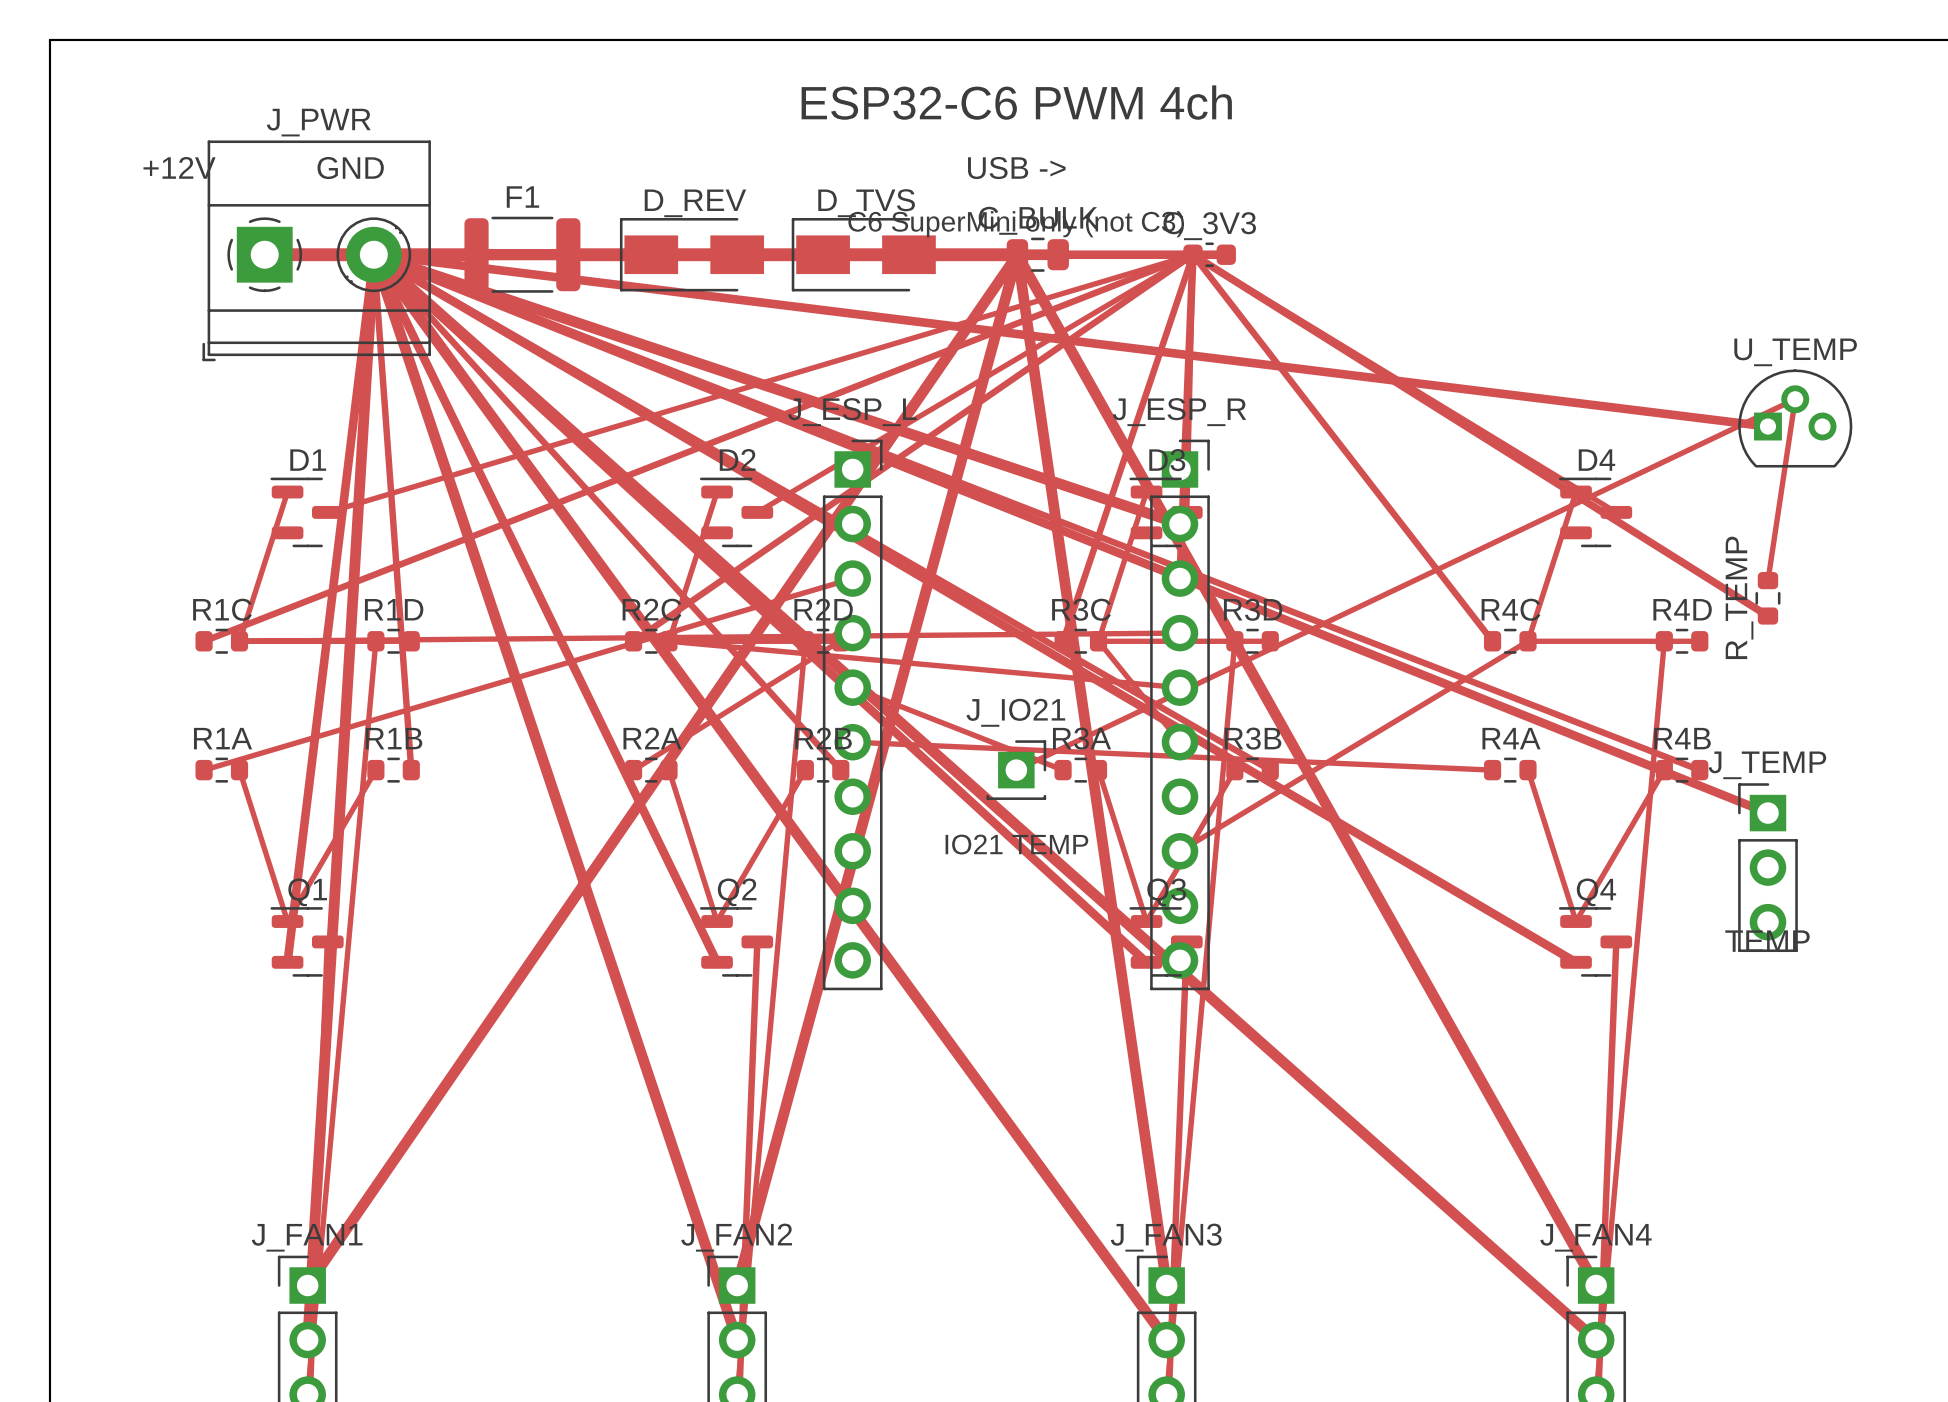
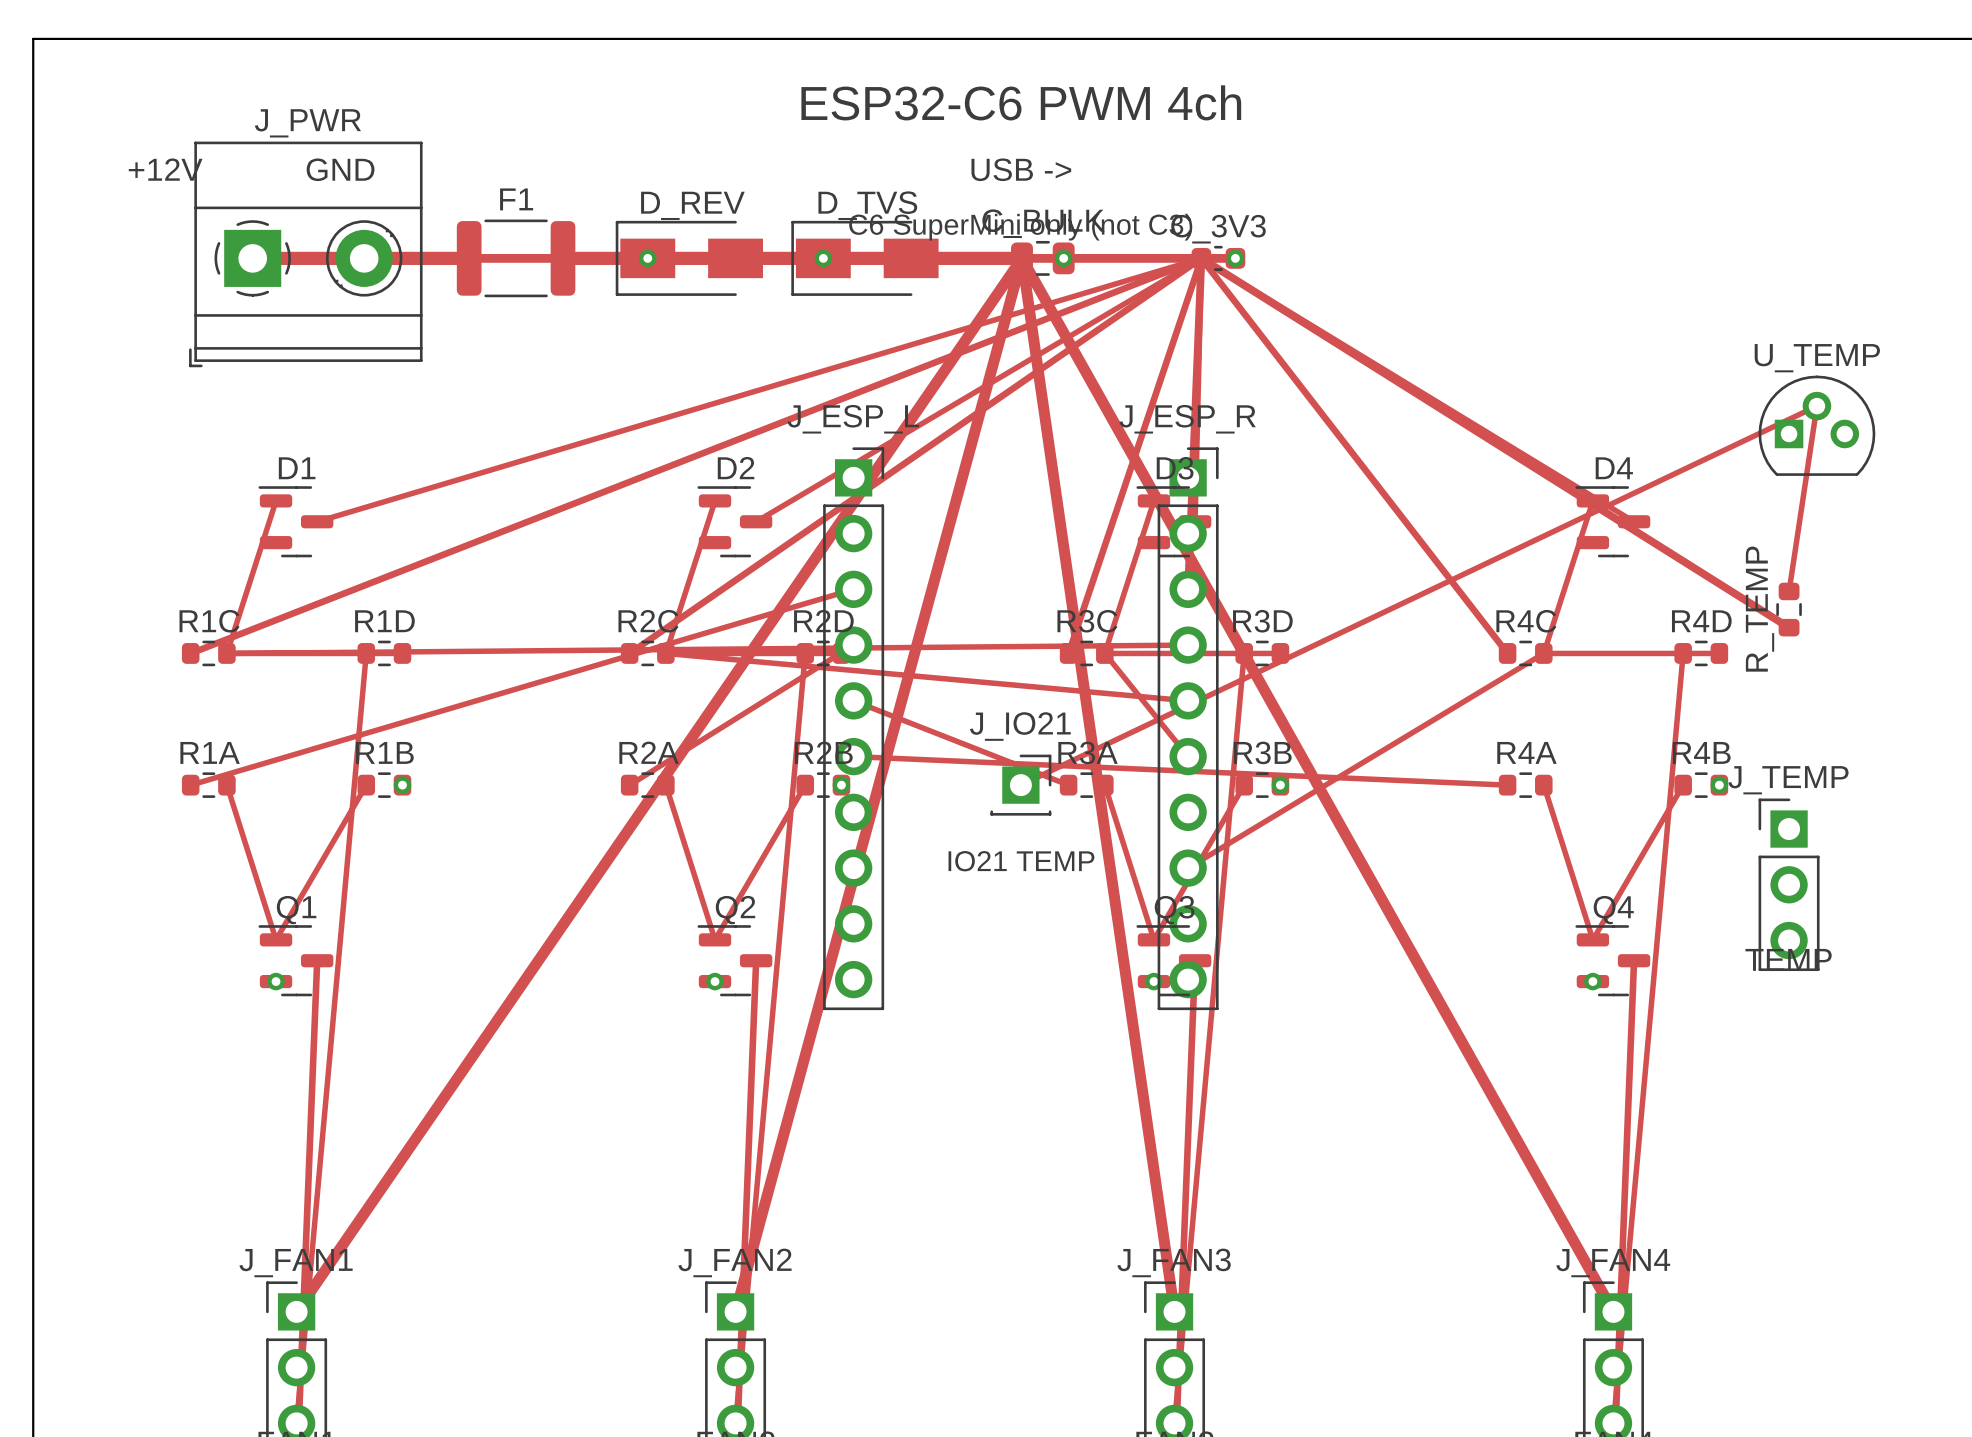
track: (373, 254) (307, 1340) -> none
track: (373, 254) (1166, 1340) -> none
track: (373, 254) (1596, 1340) -> none
track: (373, 254) (1179, 524) -> none
track: (373, 254) (737, 1340) -> none
track: (373, 254) (840, 770) -> none
track: (373, 254) (1270, 770) -> none
track: (373, 254) (1699, 770) -> none
track: (373, 254) (411, 770) -> none
track: (373, 254) (1576, 962) -> none
track: (373, 254) (1767, 813) -> none
track: (373, 254) (1146, 962) -> none
track: (373, 254) (1767, 426) -> none
track: (373, 254) (717, 962) -> none
track: (373, 254) (287, 962) -> none
via: none -> (647, 258)
via: none -> (823, 258)
via: none -> (1063, 258)
via: none -> (1235, 258)
via: none -> (402, 785)
via: none -> (841, 785)
via: none -> (1280, 785)
via: none -> (1719, 785)
via: none -> (276, 981)
via: none -> (714, 981)
via: none -> (1153, 981)
via: none -> (1592, 981)

